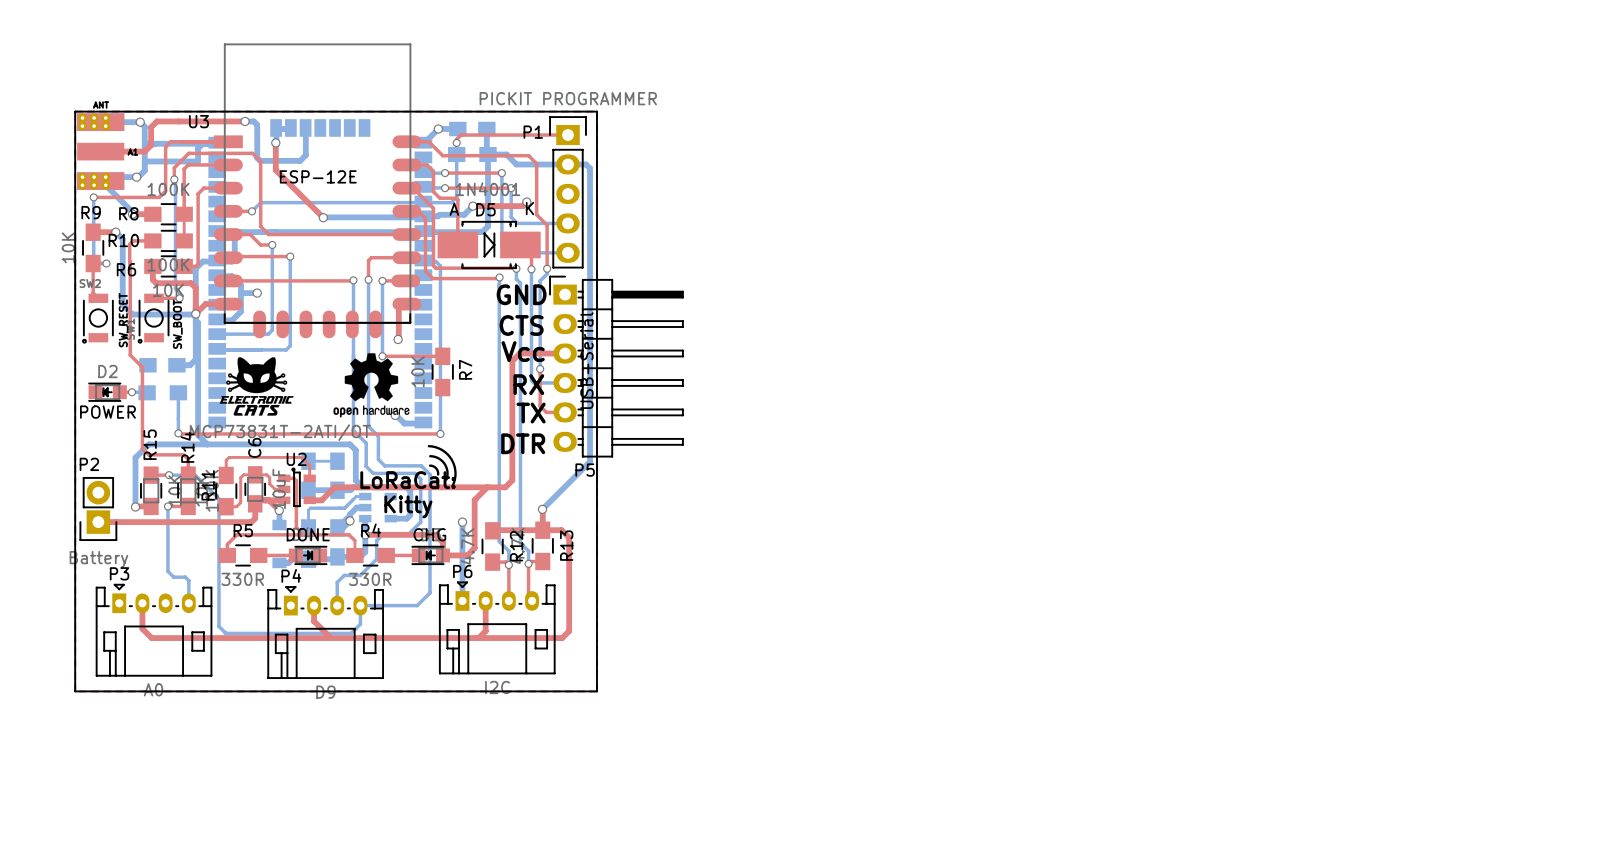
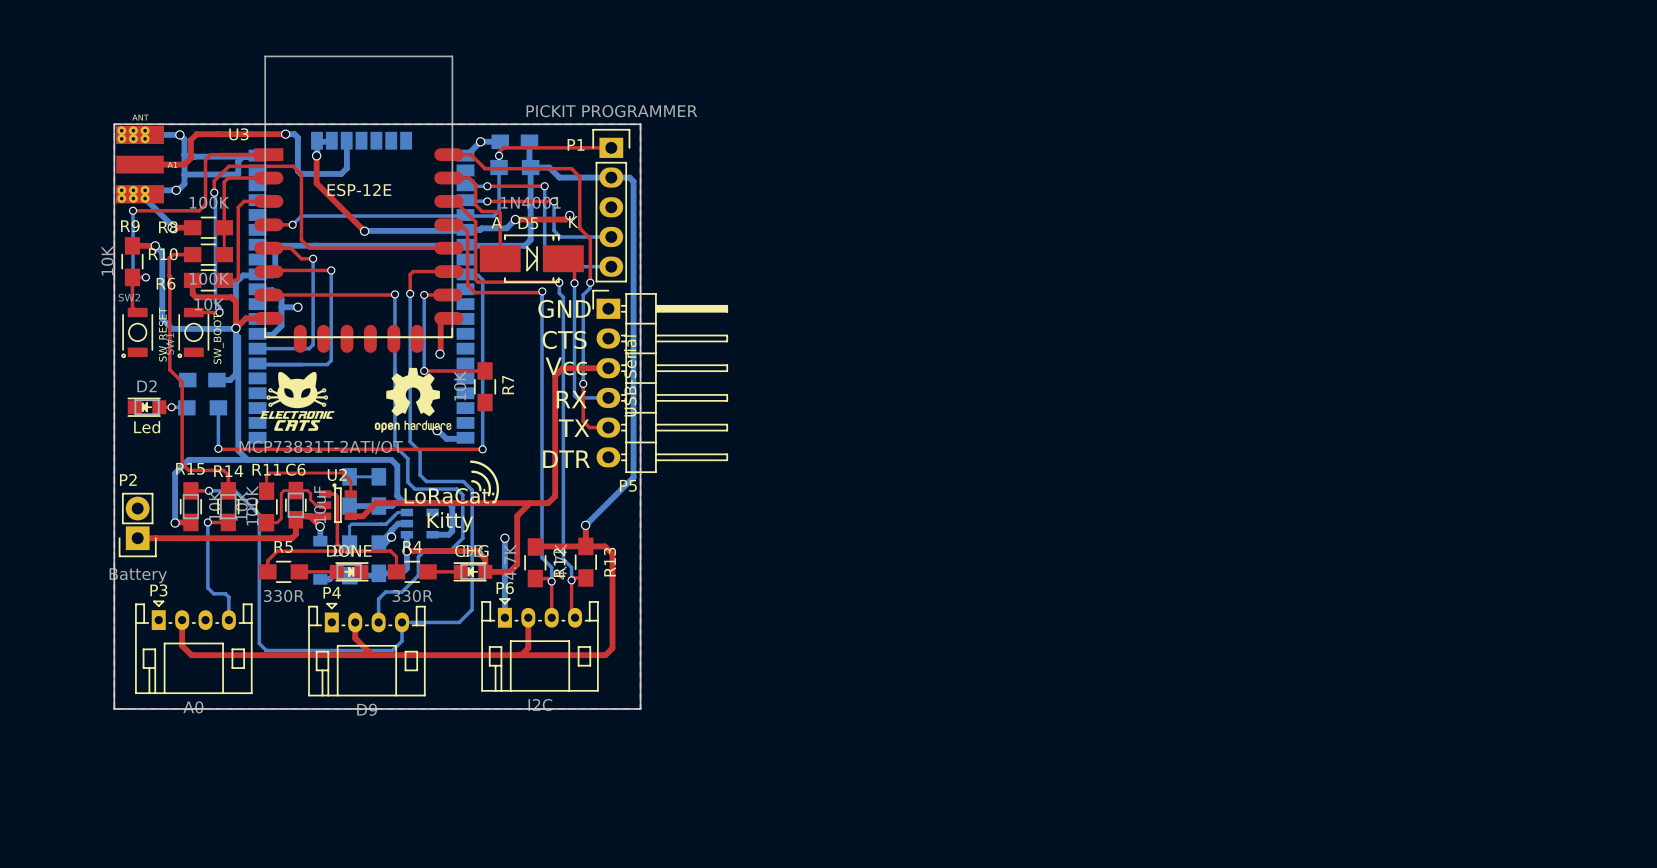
D2 value: POWER (107, 412) -> Led (147, 427)
R15 name rotation: 0° (150, 444) -> 90° clockwise (190, 468)
R14 name rotation: 0° (187, 447) -> 90° clockwise (228, 471)
C6 name rotation: 0° (254, 447) -> 90° clockwise (295, 469)
R11 name rotation: 0° (208, 485) -> 90° clockwise (266, 469)

